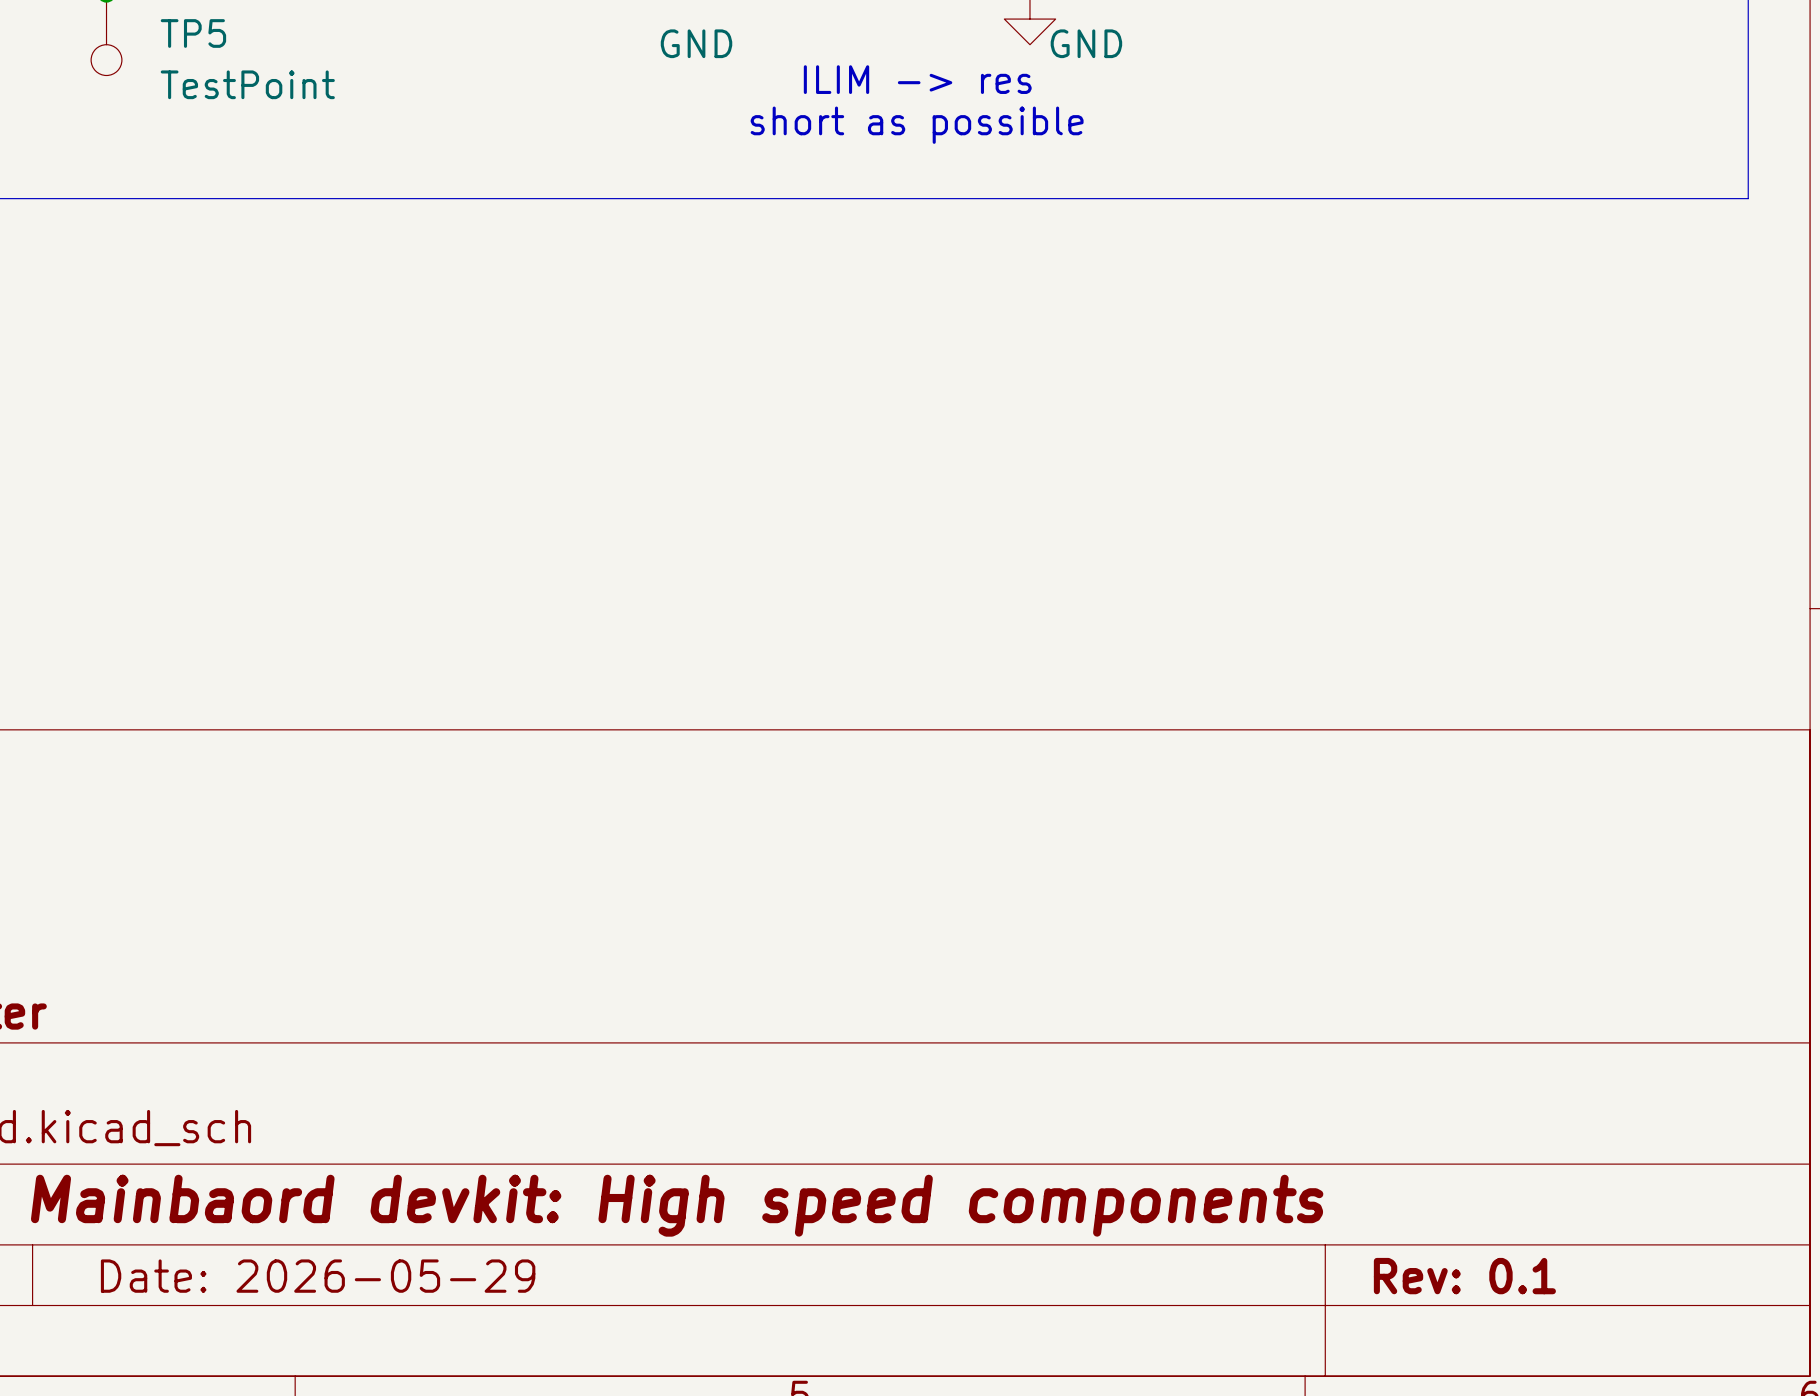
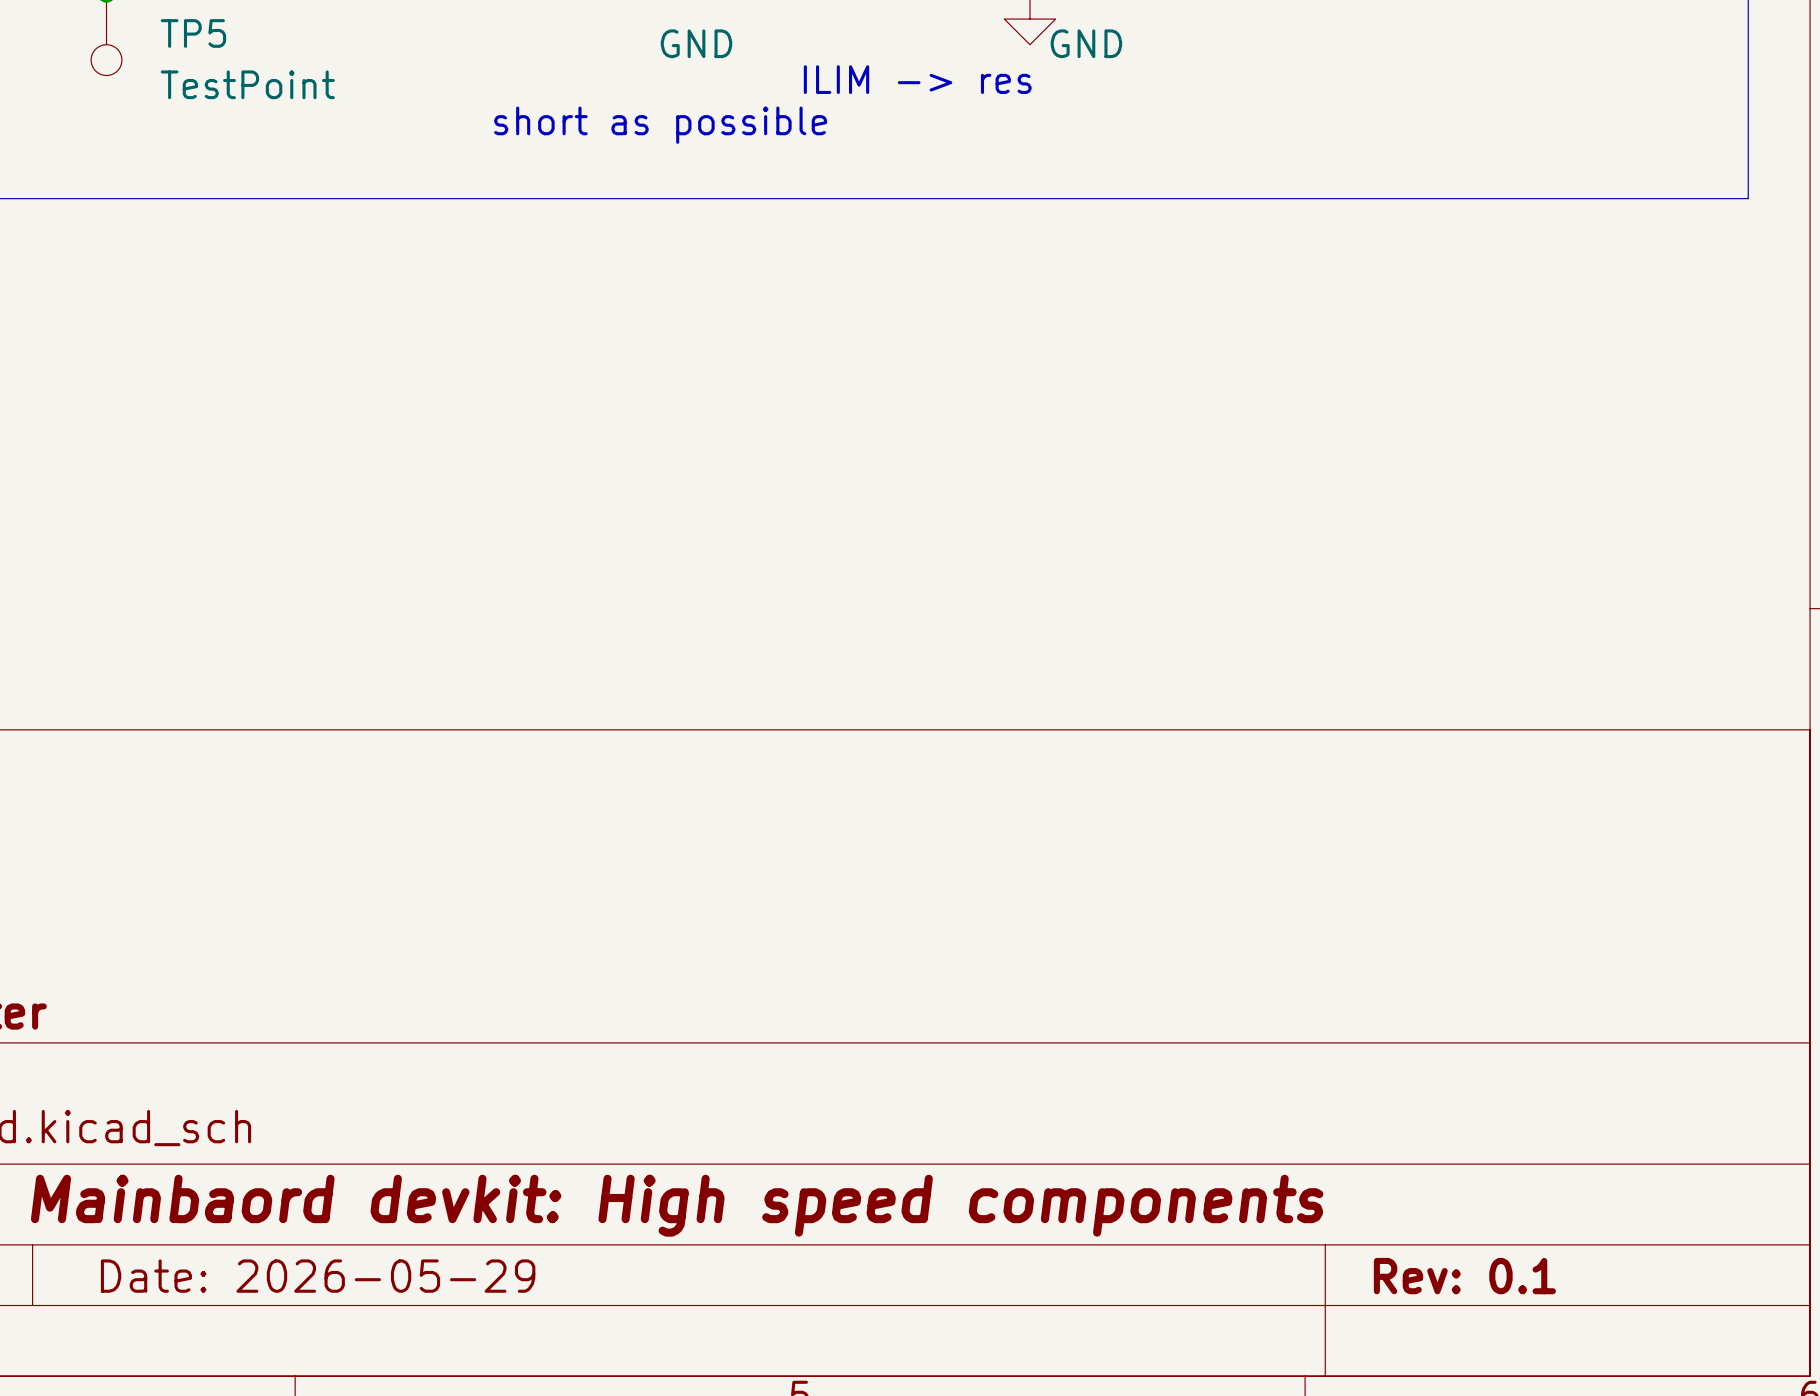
text position: short as possible (917, 125) -> short as possible (660, 125)

